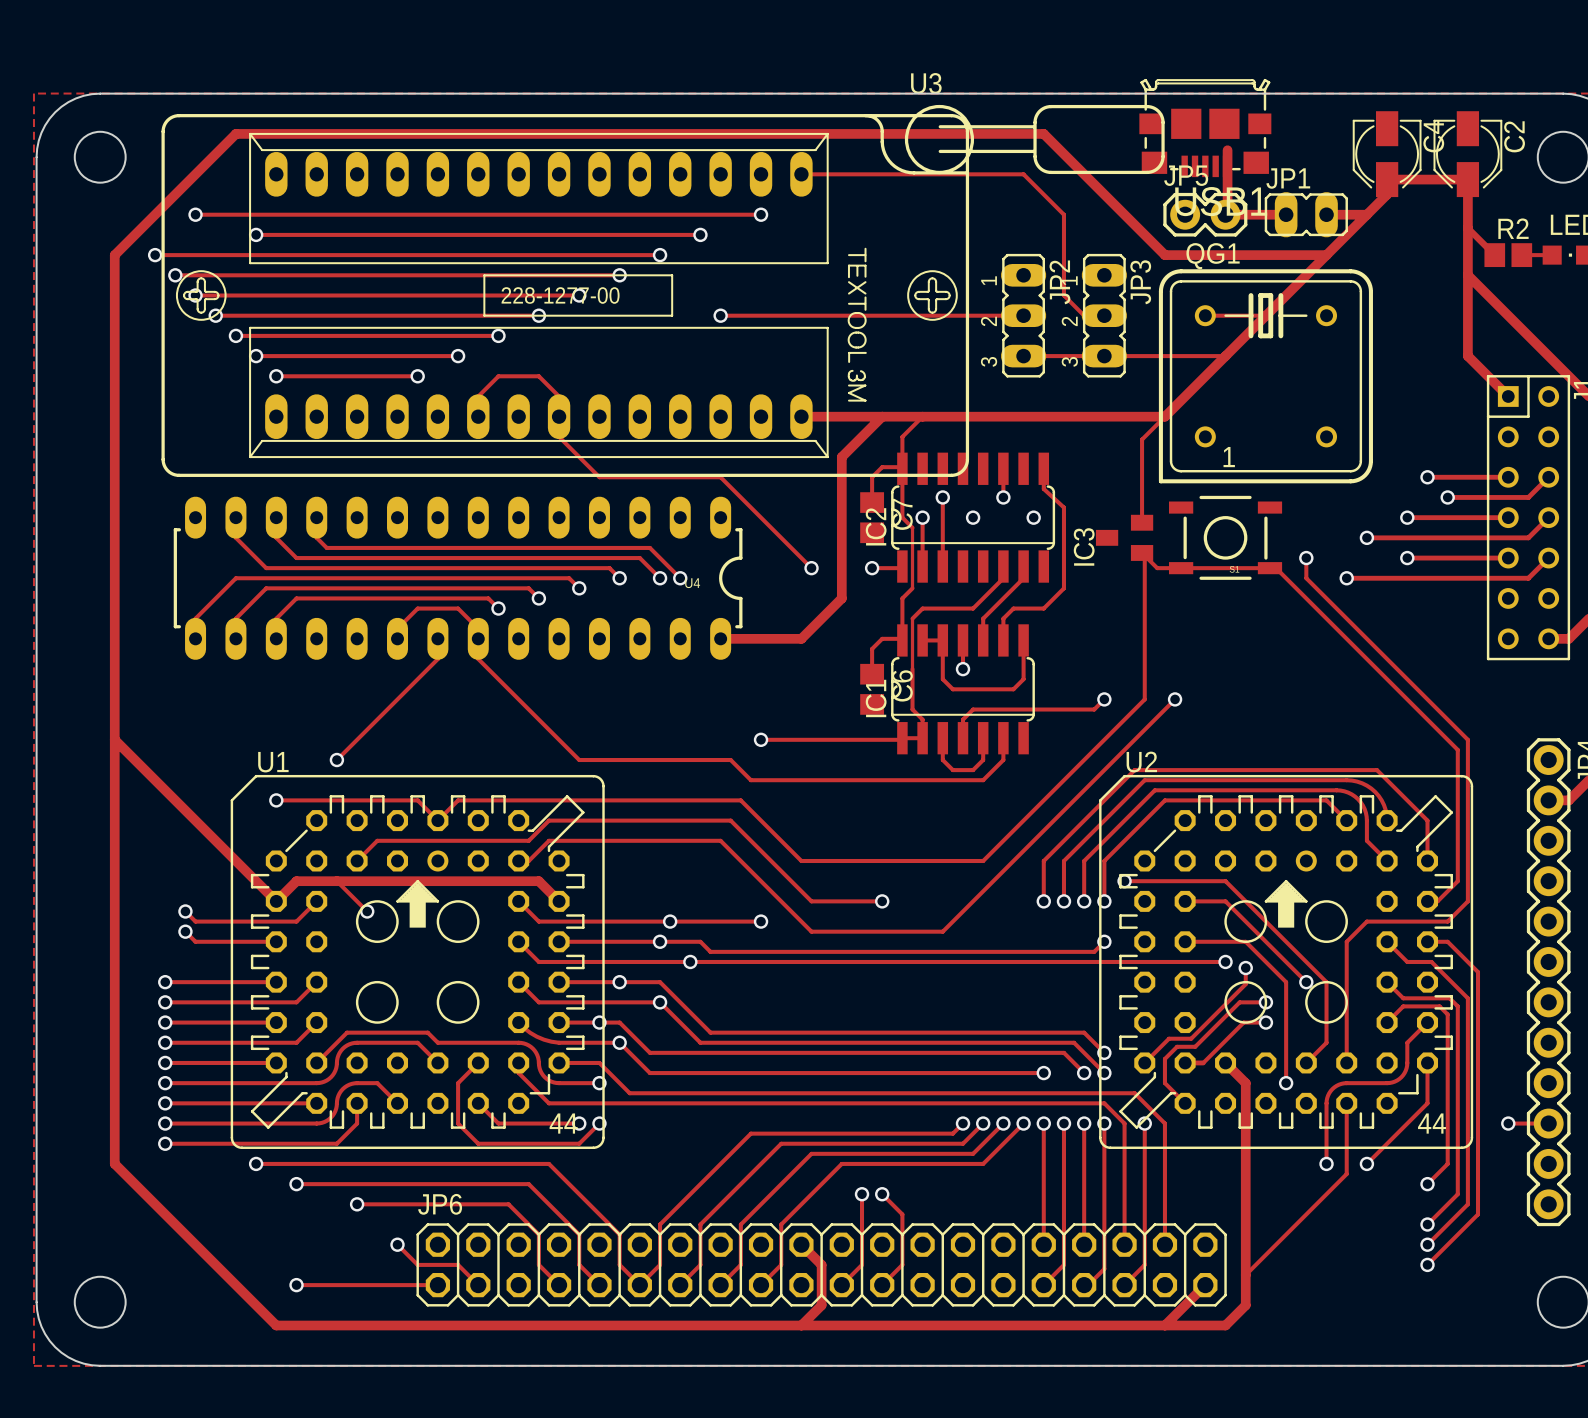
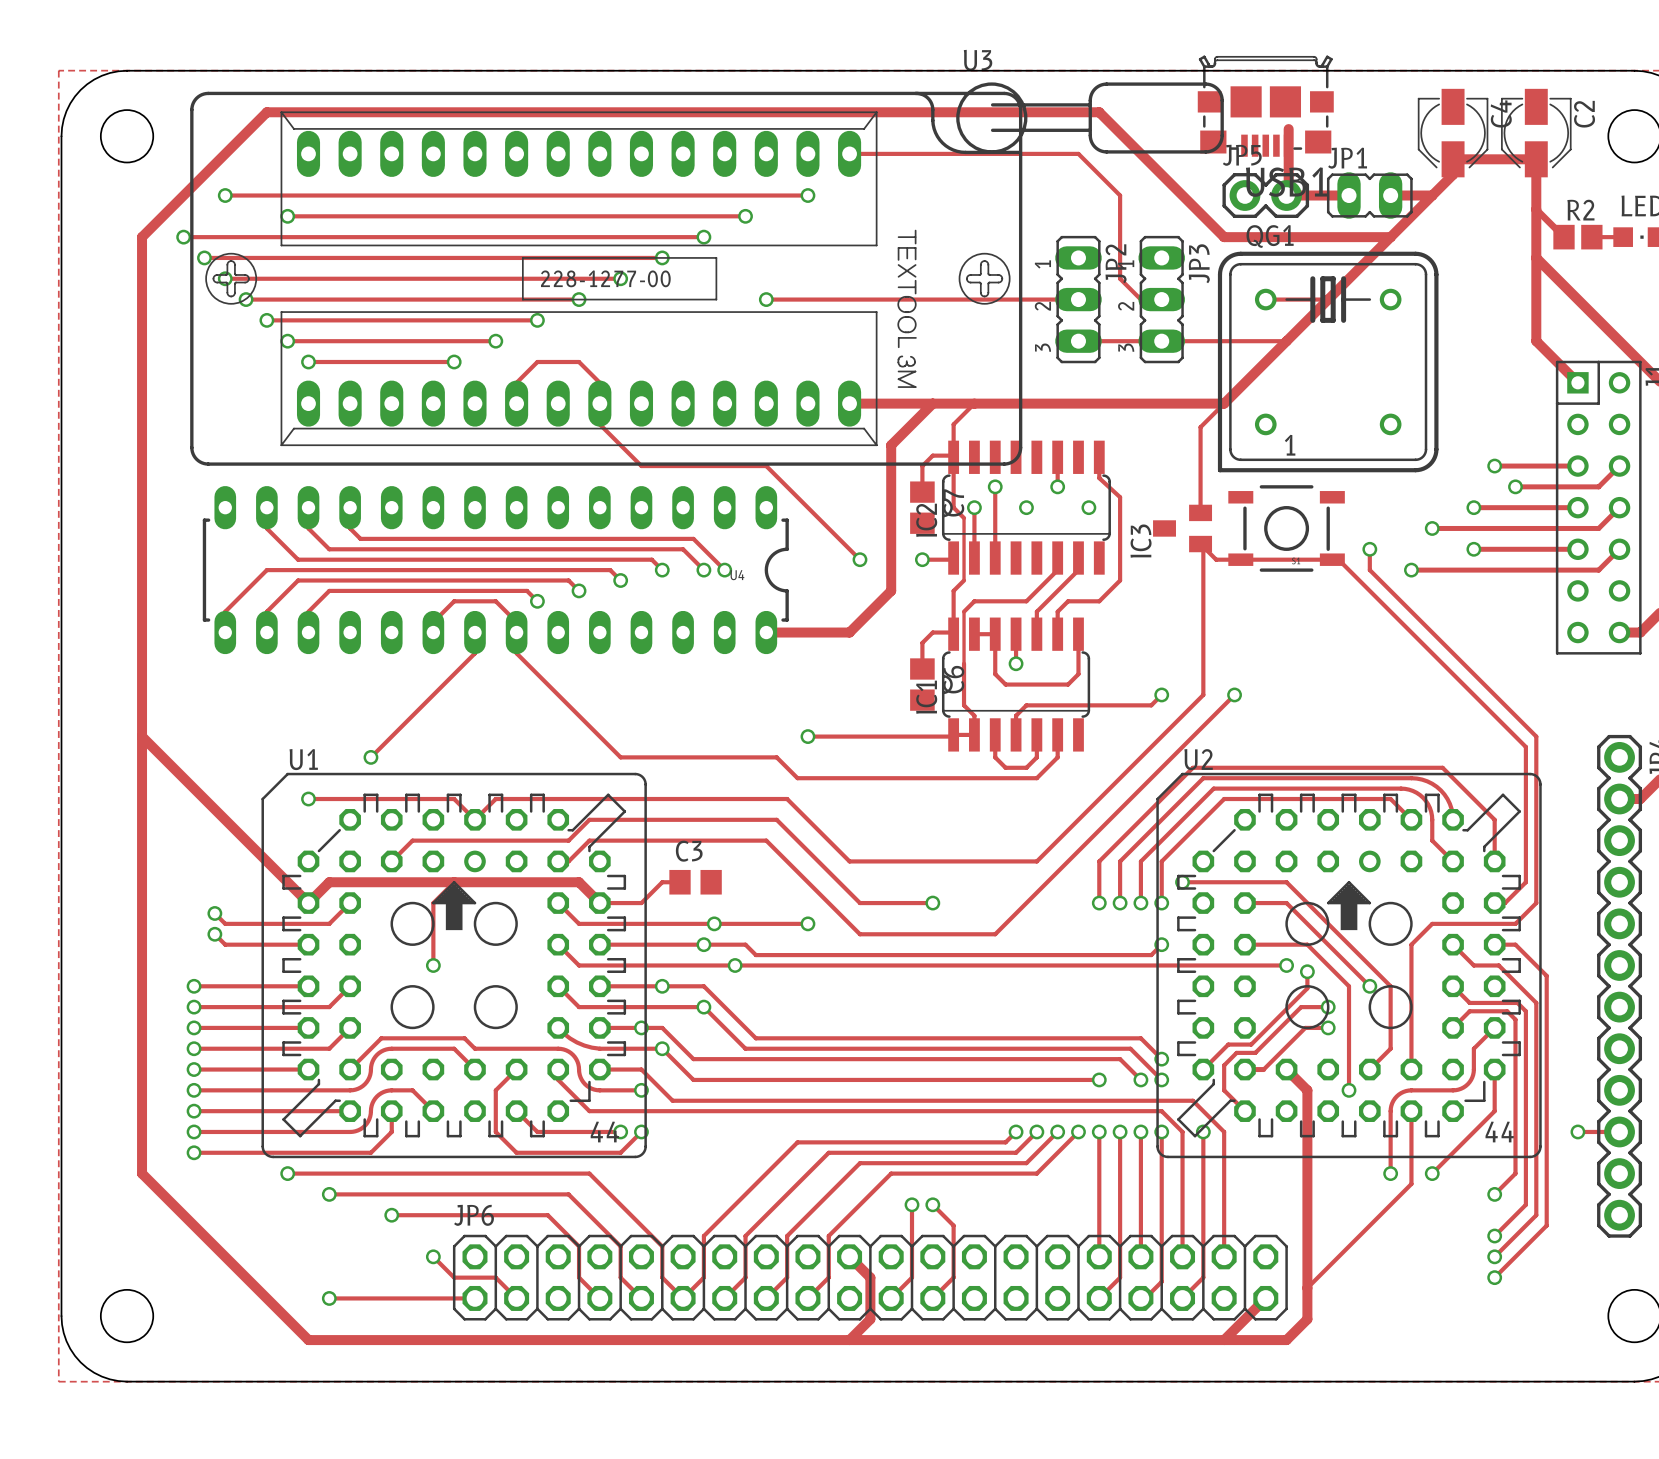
track: (336, 881) (367, 911) -> none
track: none -> (454, 882) (433, 903) (433, 965)
track: none -> (680, 882) (662, 882) (641, 903) (599, 903)
C3: none -> (695, 882)
via position: (367, 911) -> (433, 965)

